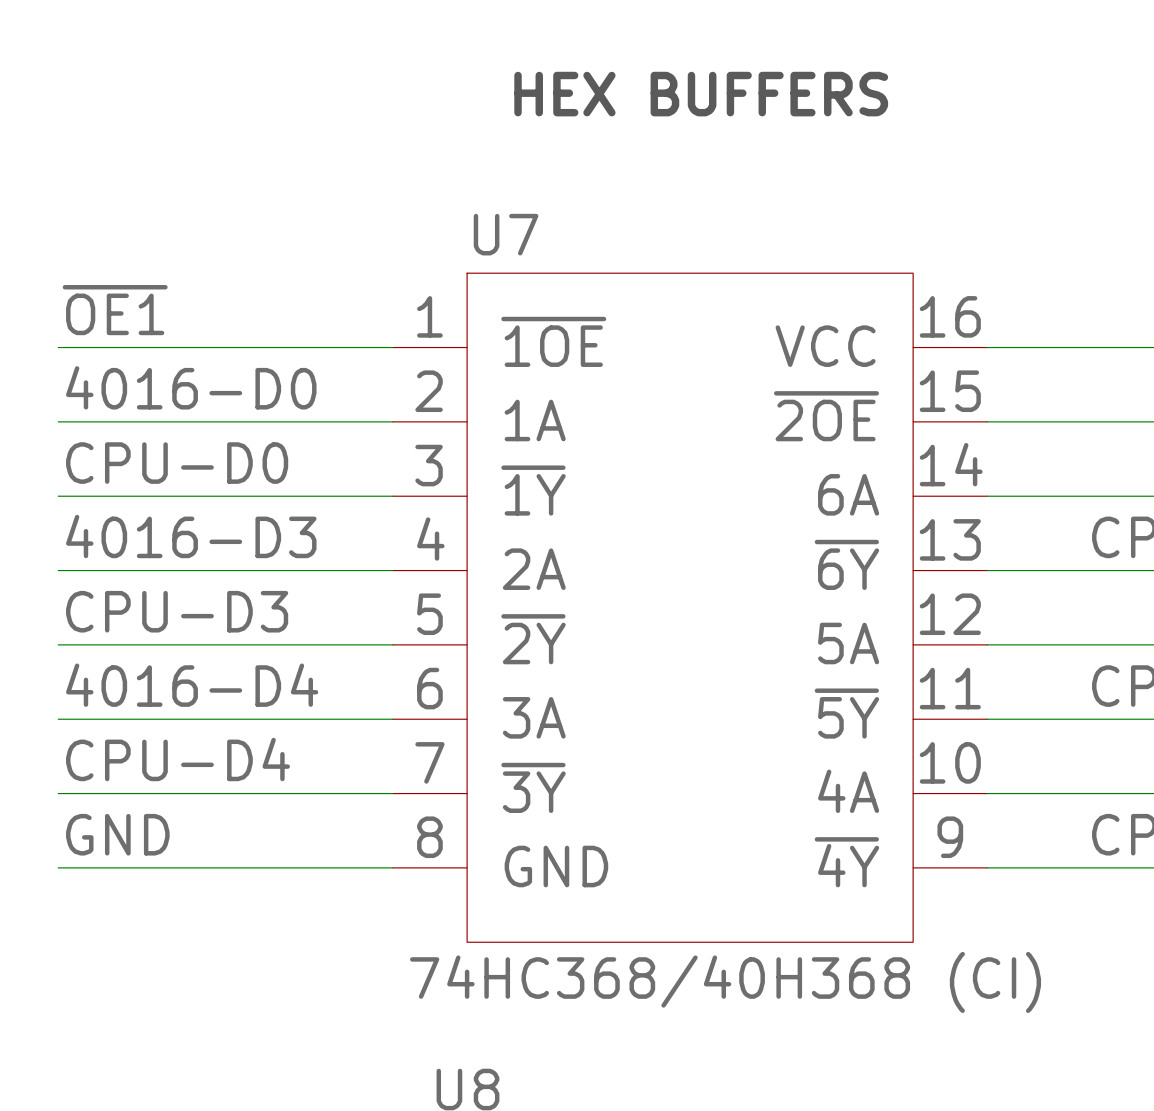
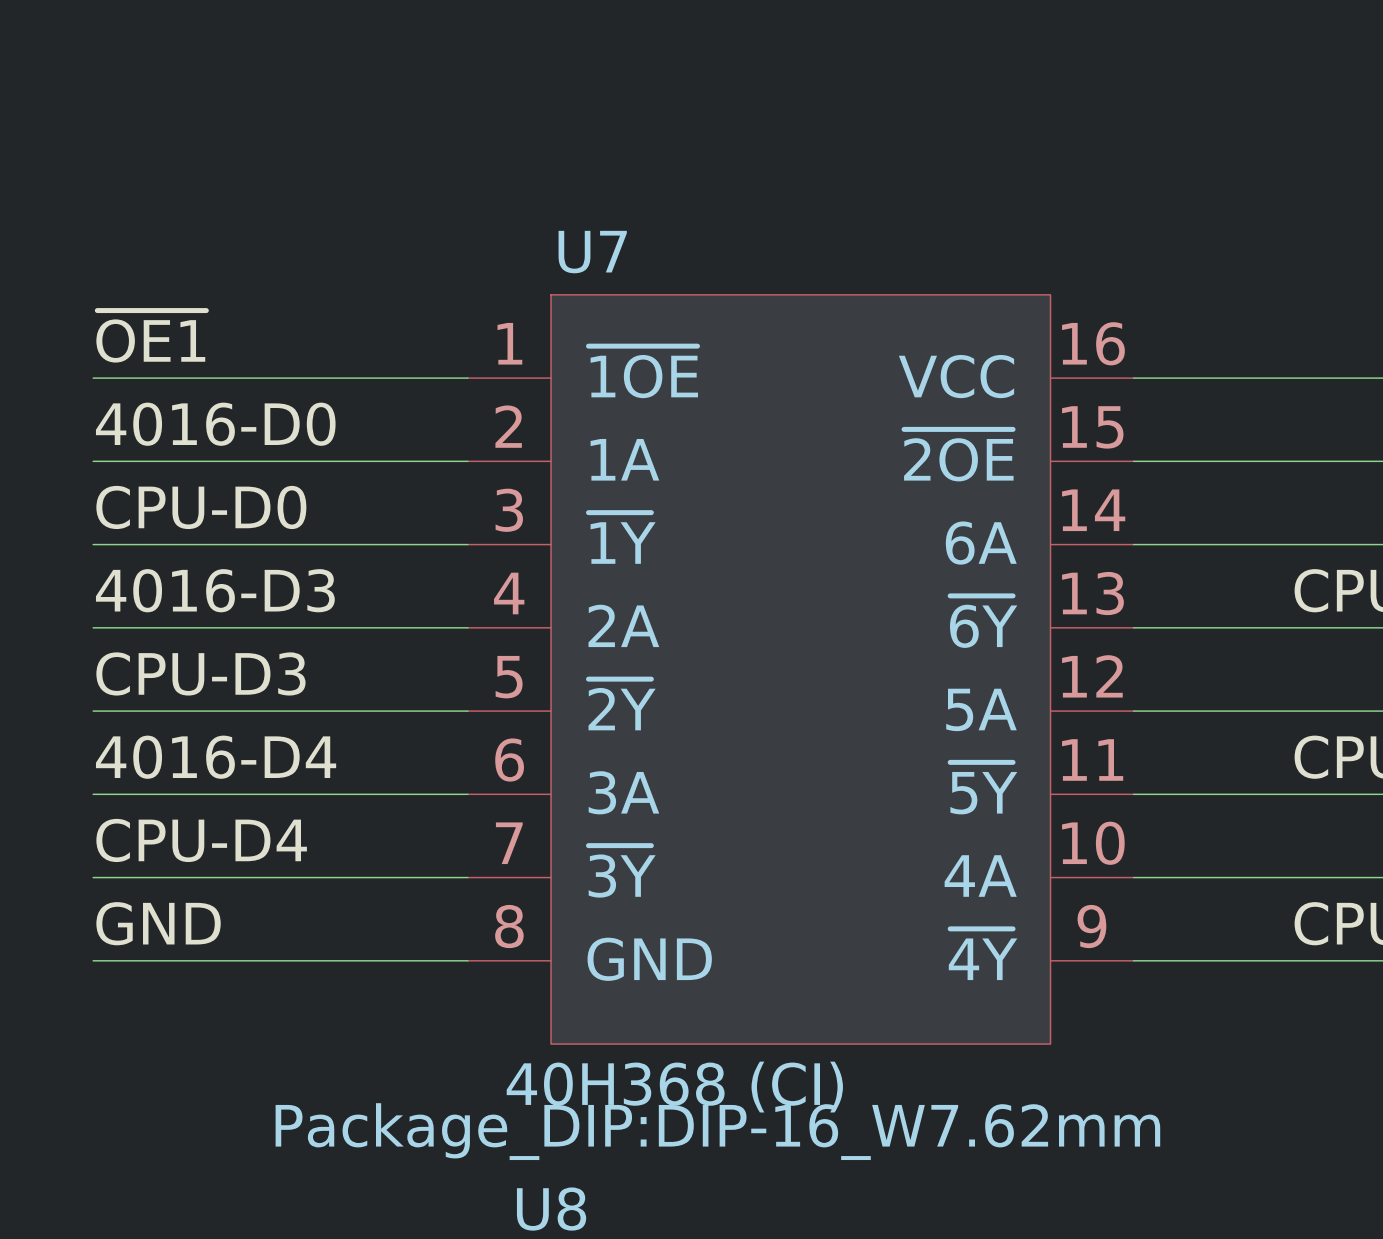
text: HEX BUFFERS (701, 94) -> none
U7 value: 74HC368/40H368 (CI) (725, 982) -> 40H368 (CI) (674, 1087)
U8 text: none -> Package_DIP:DIP-16_W7.62mm (717, 1131)

